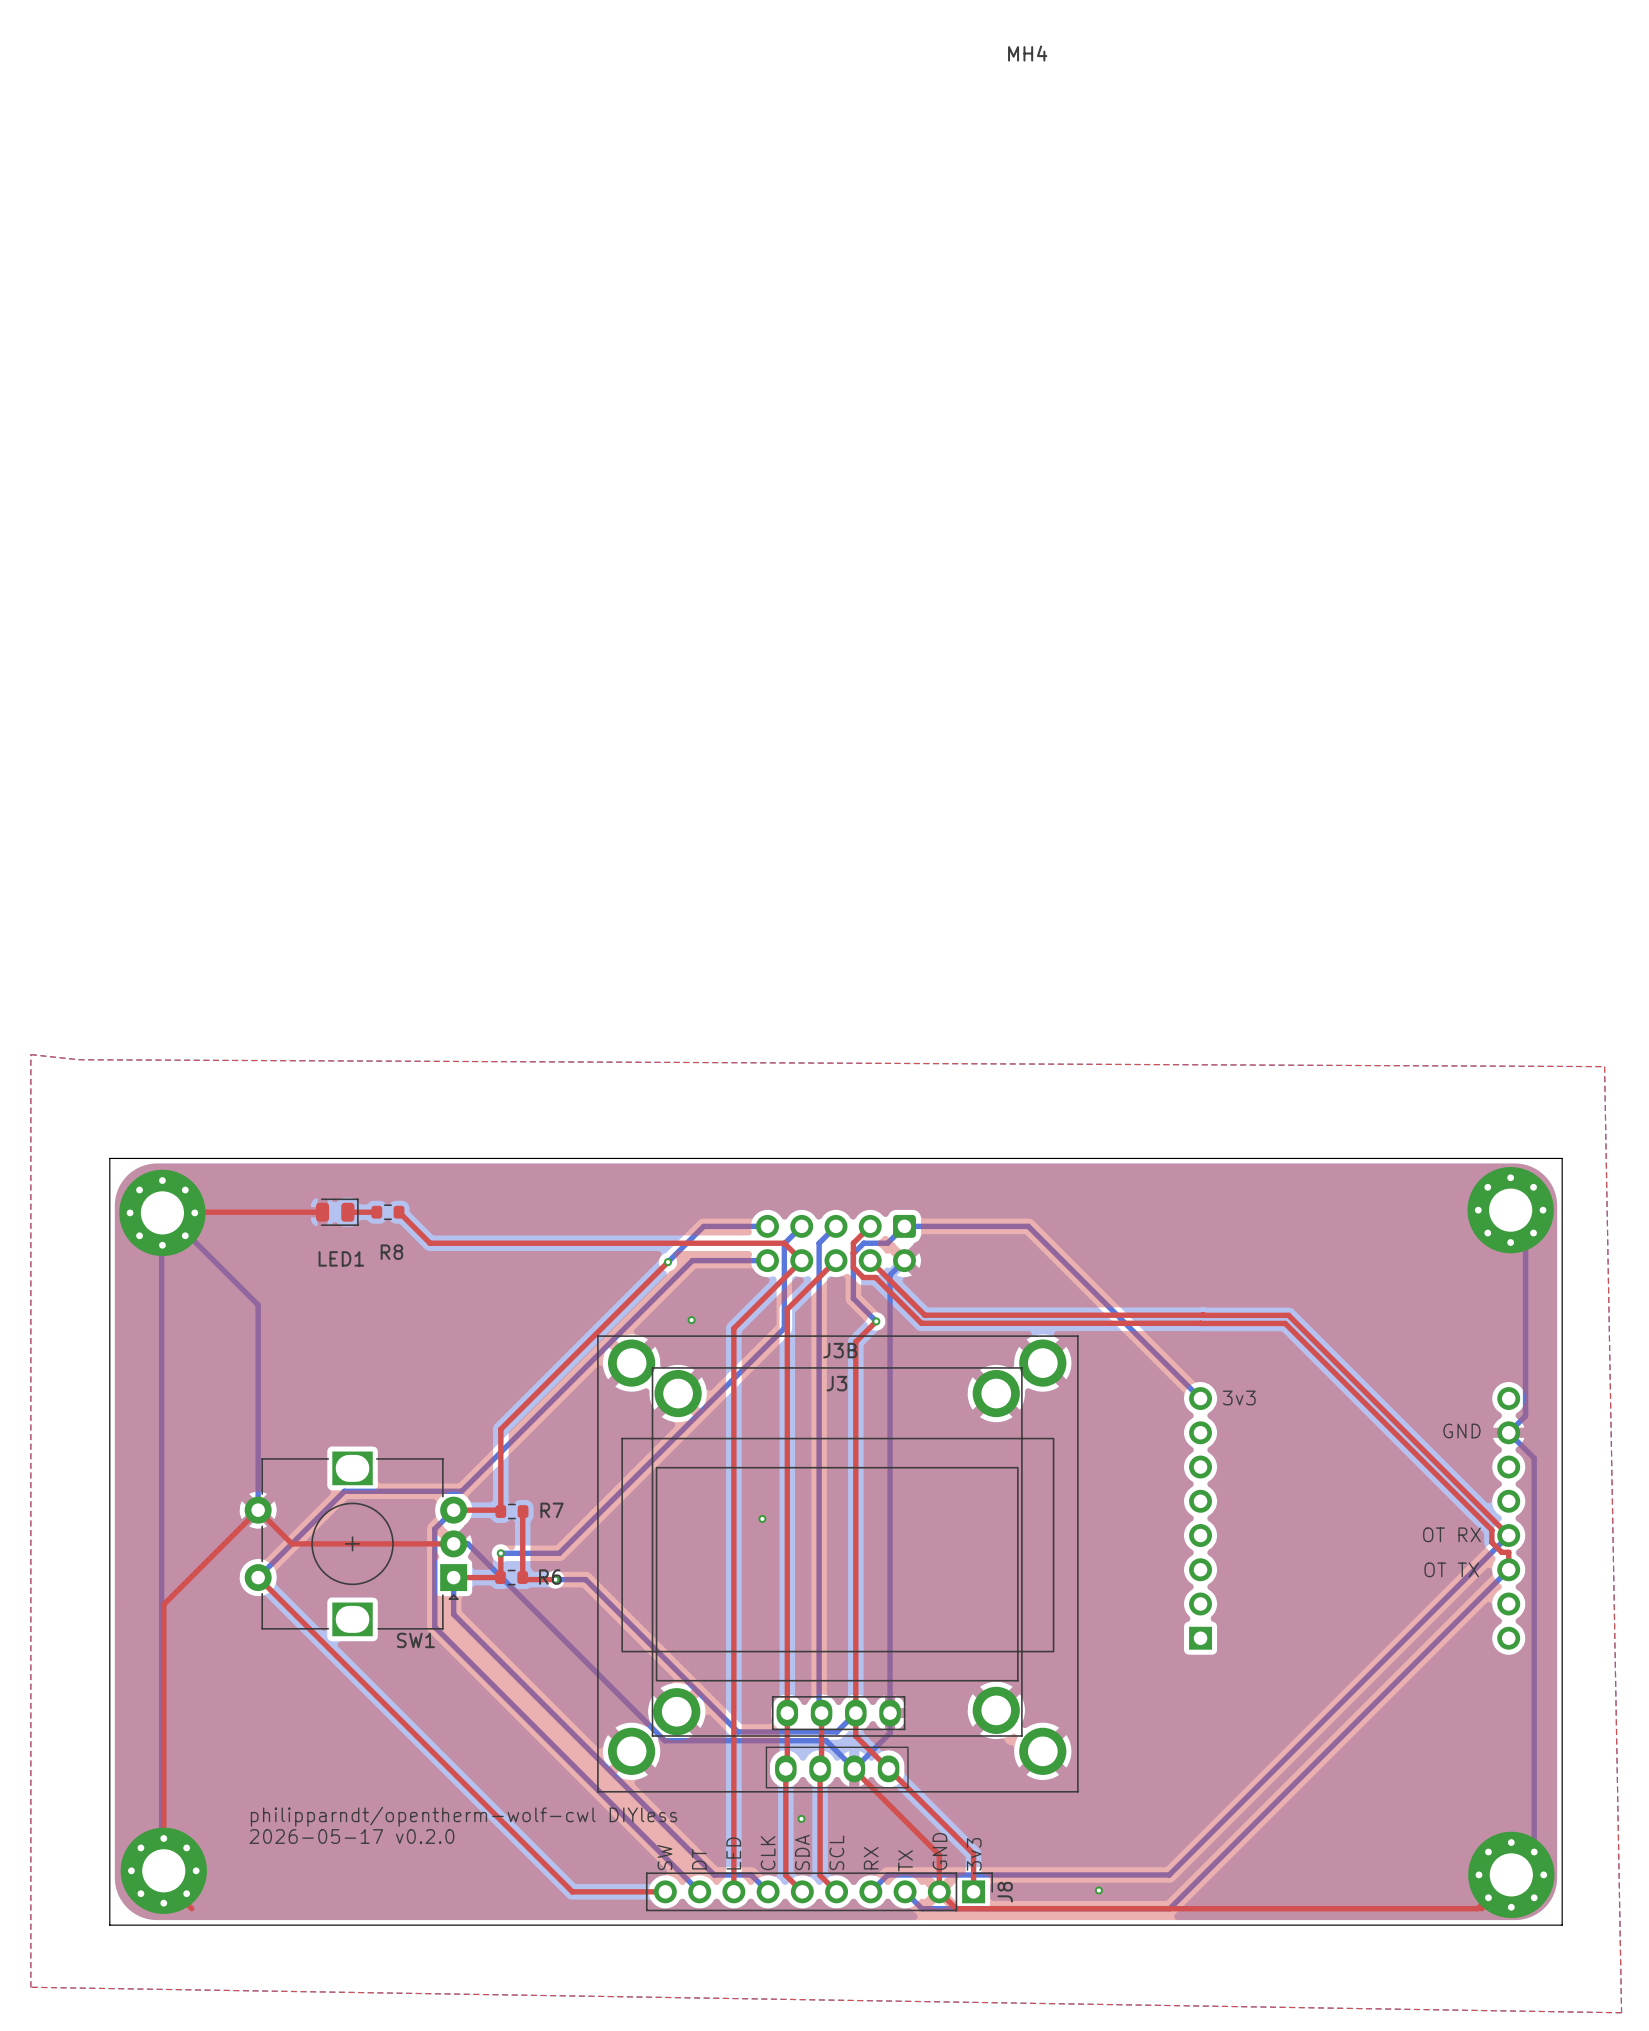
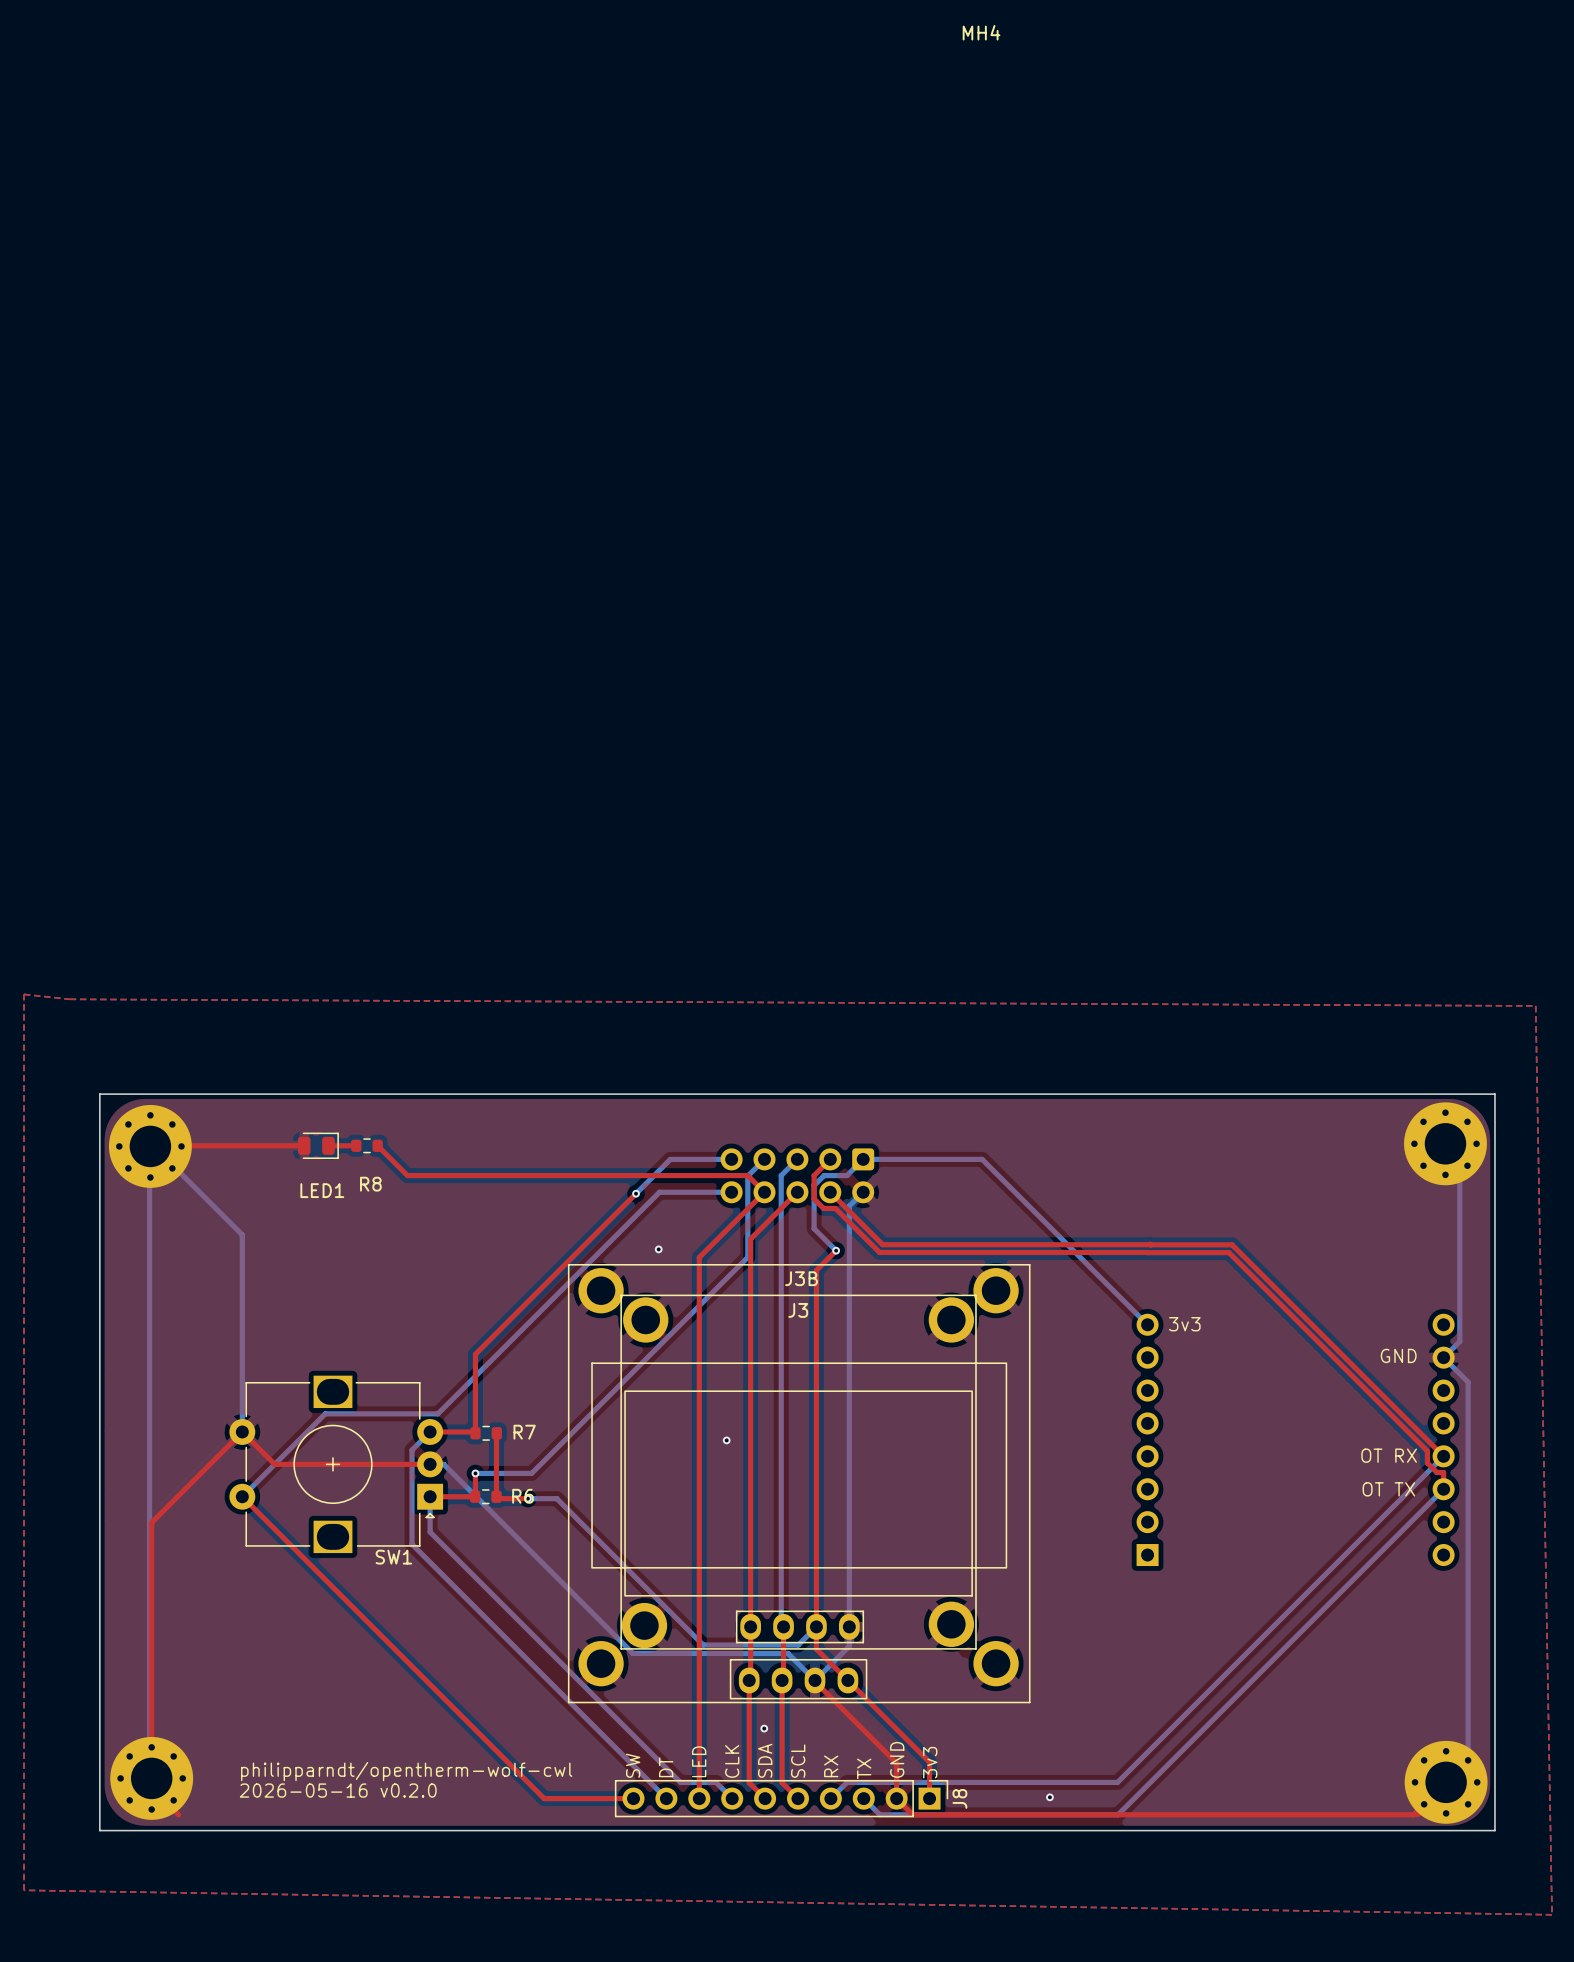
text: philipparndt/opentherm-wolf-cwl DIYless (463, 1816) -> none
text: 2026-05-17 v0.2.0 (351, 1836) -> none
text: none -> philipparndt/opentherm-wolf-cwl (406, 1771)
text: none -> 2026-05-16 v0.2.0 (338, 1790)

